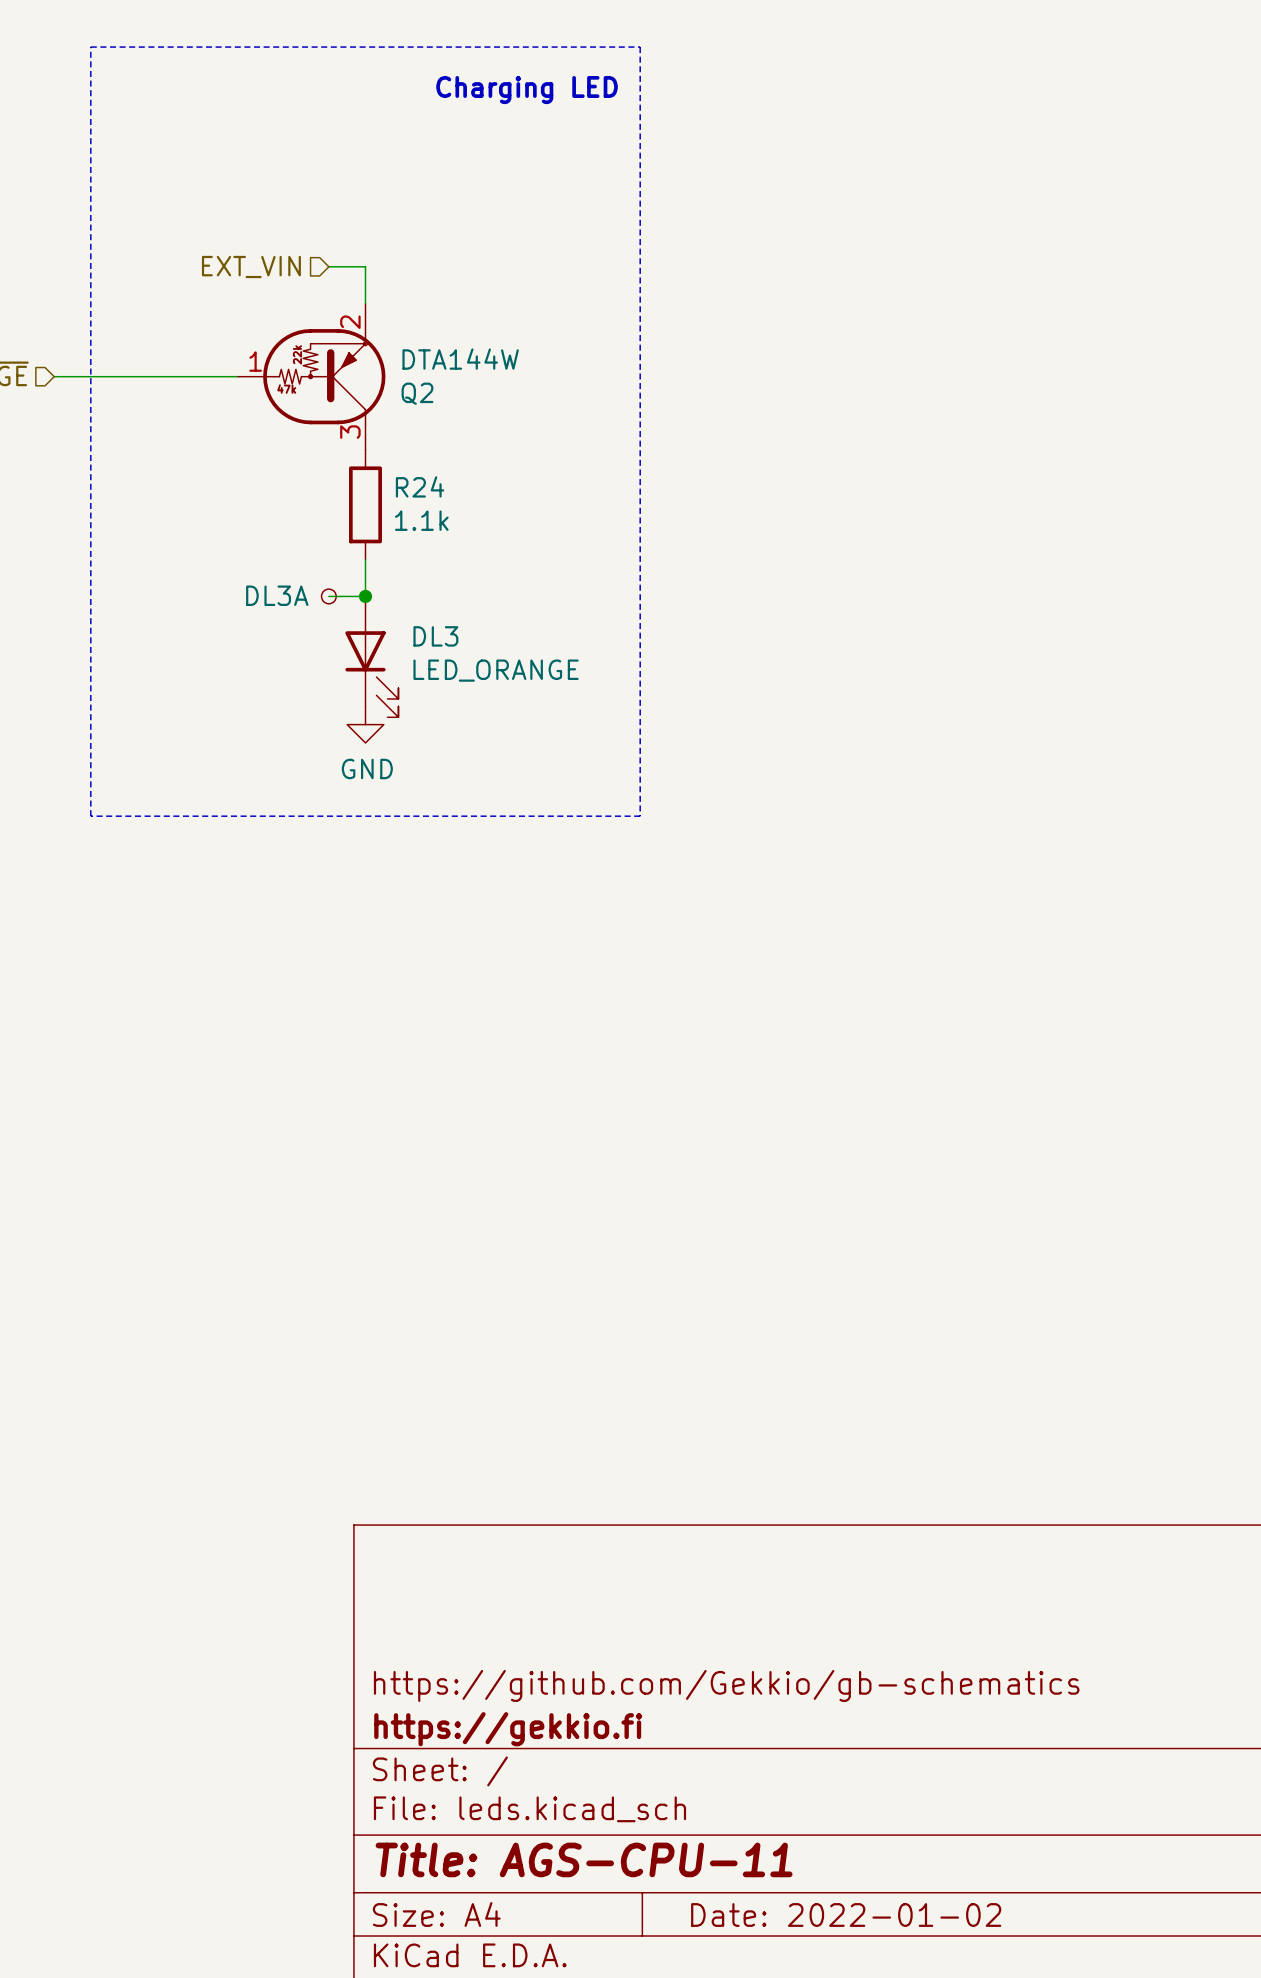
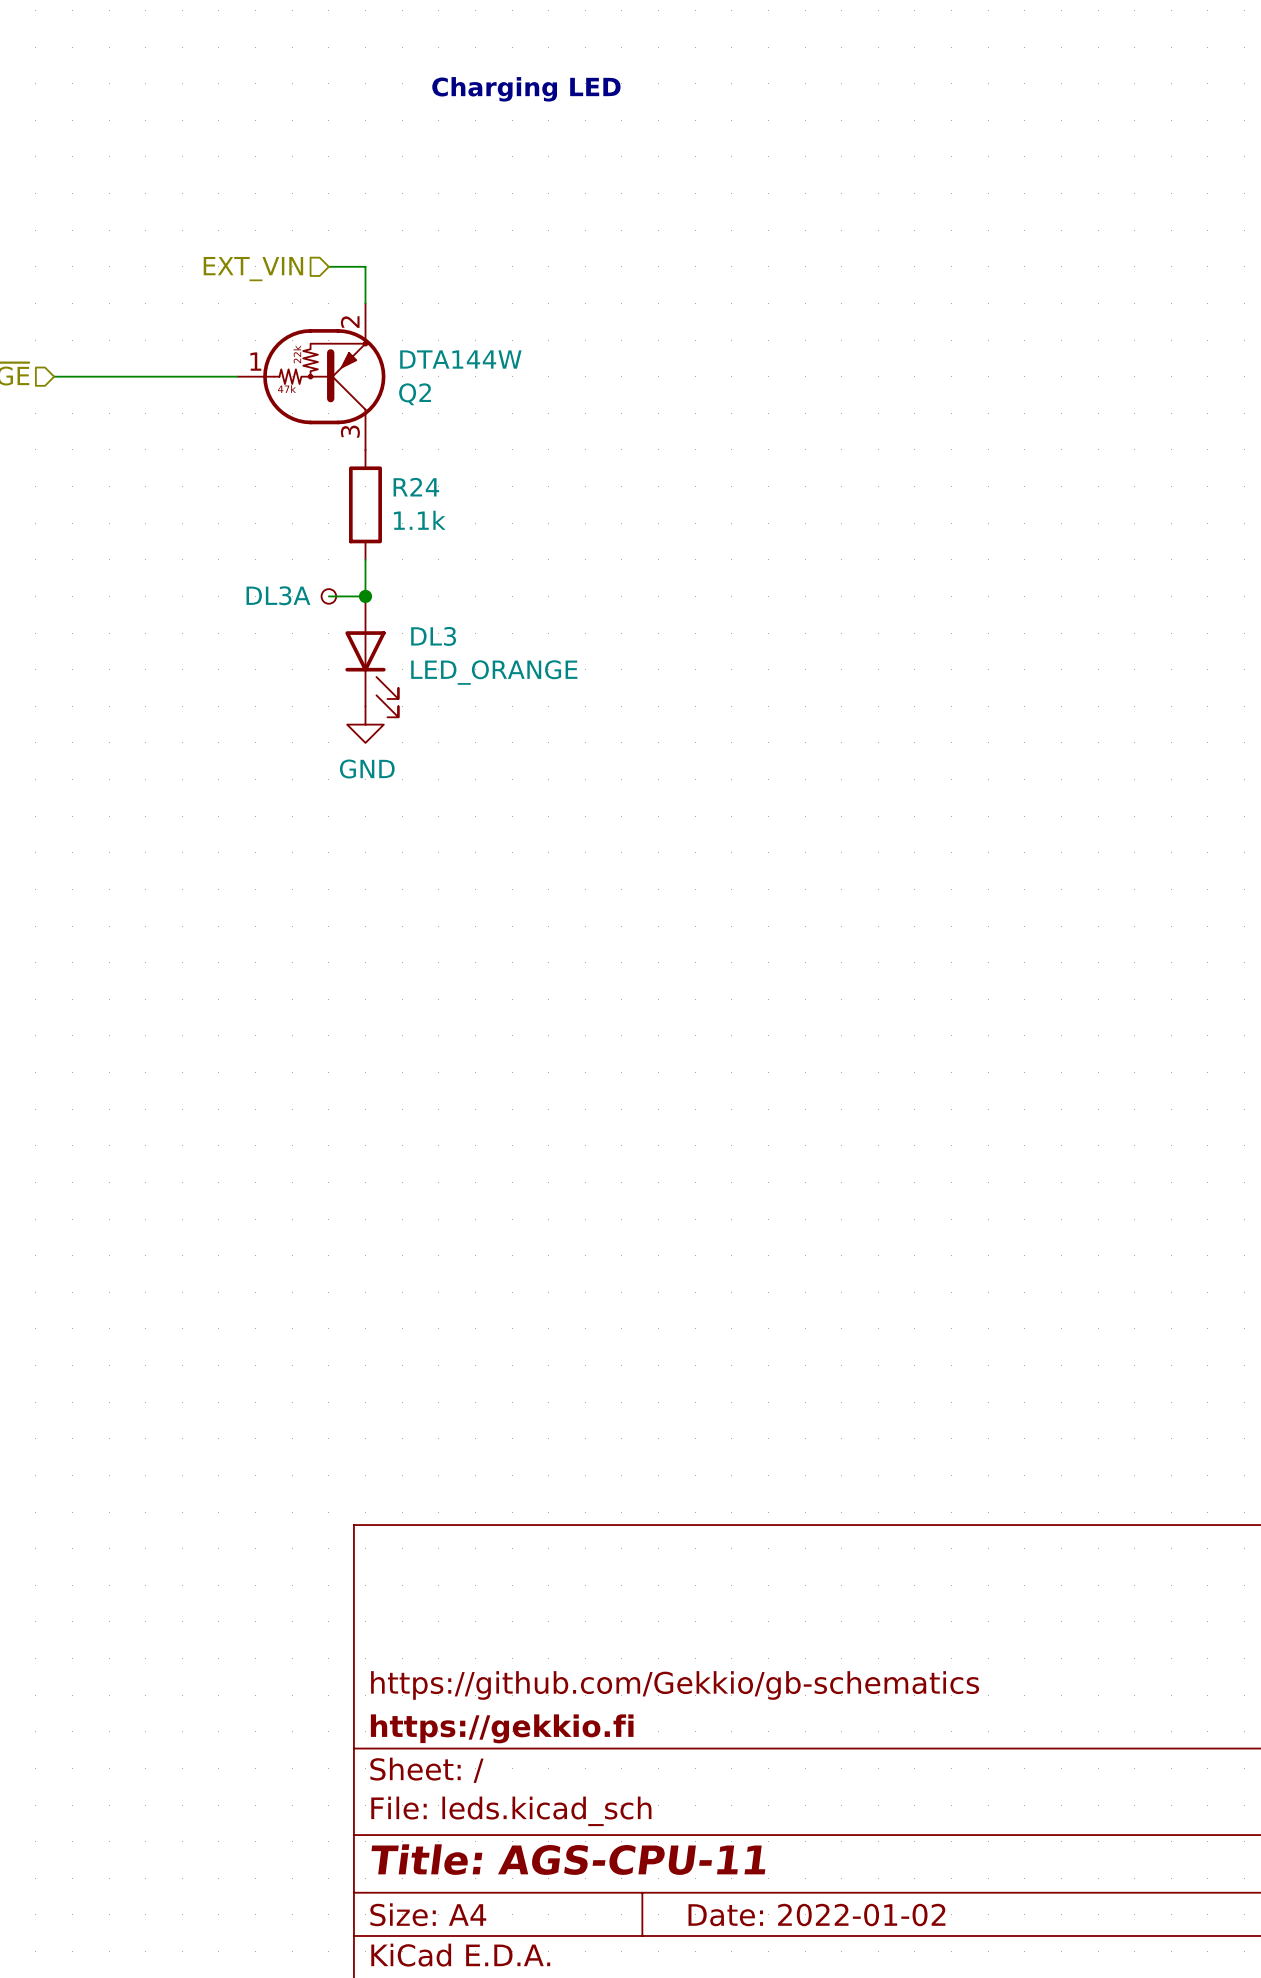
line: (90, 47) (640, 47) (640, 816) (90, 816) (90, 47) -> none

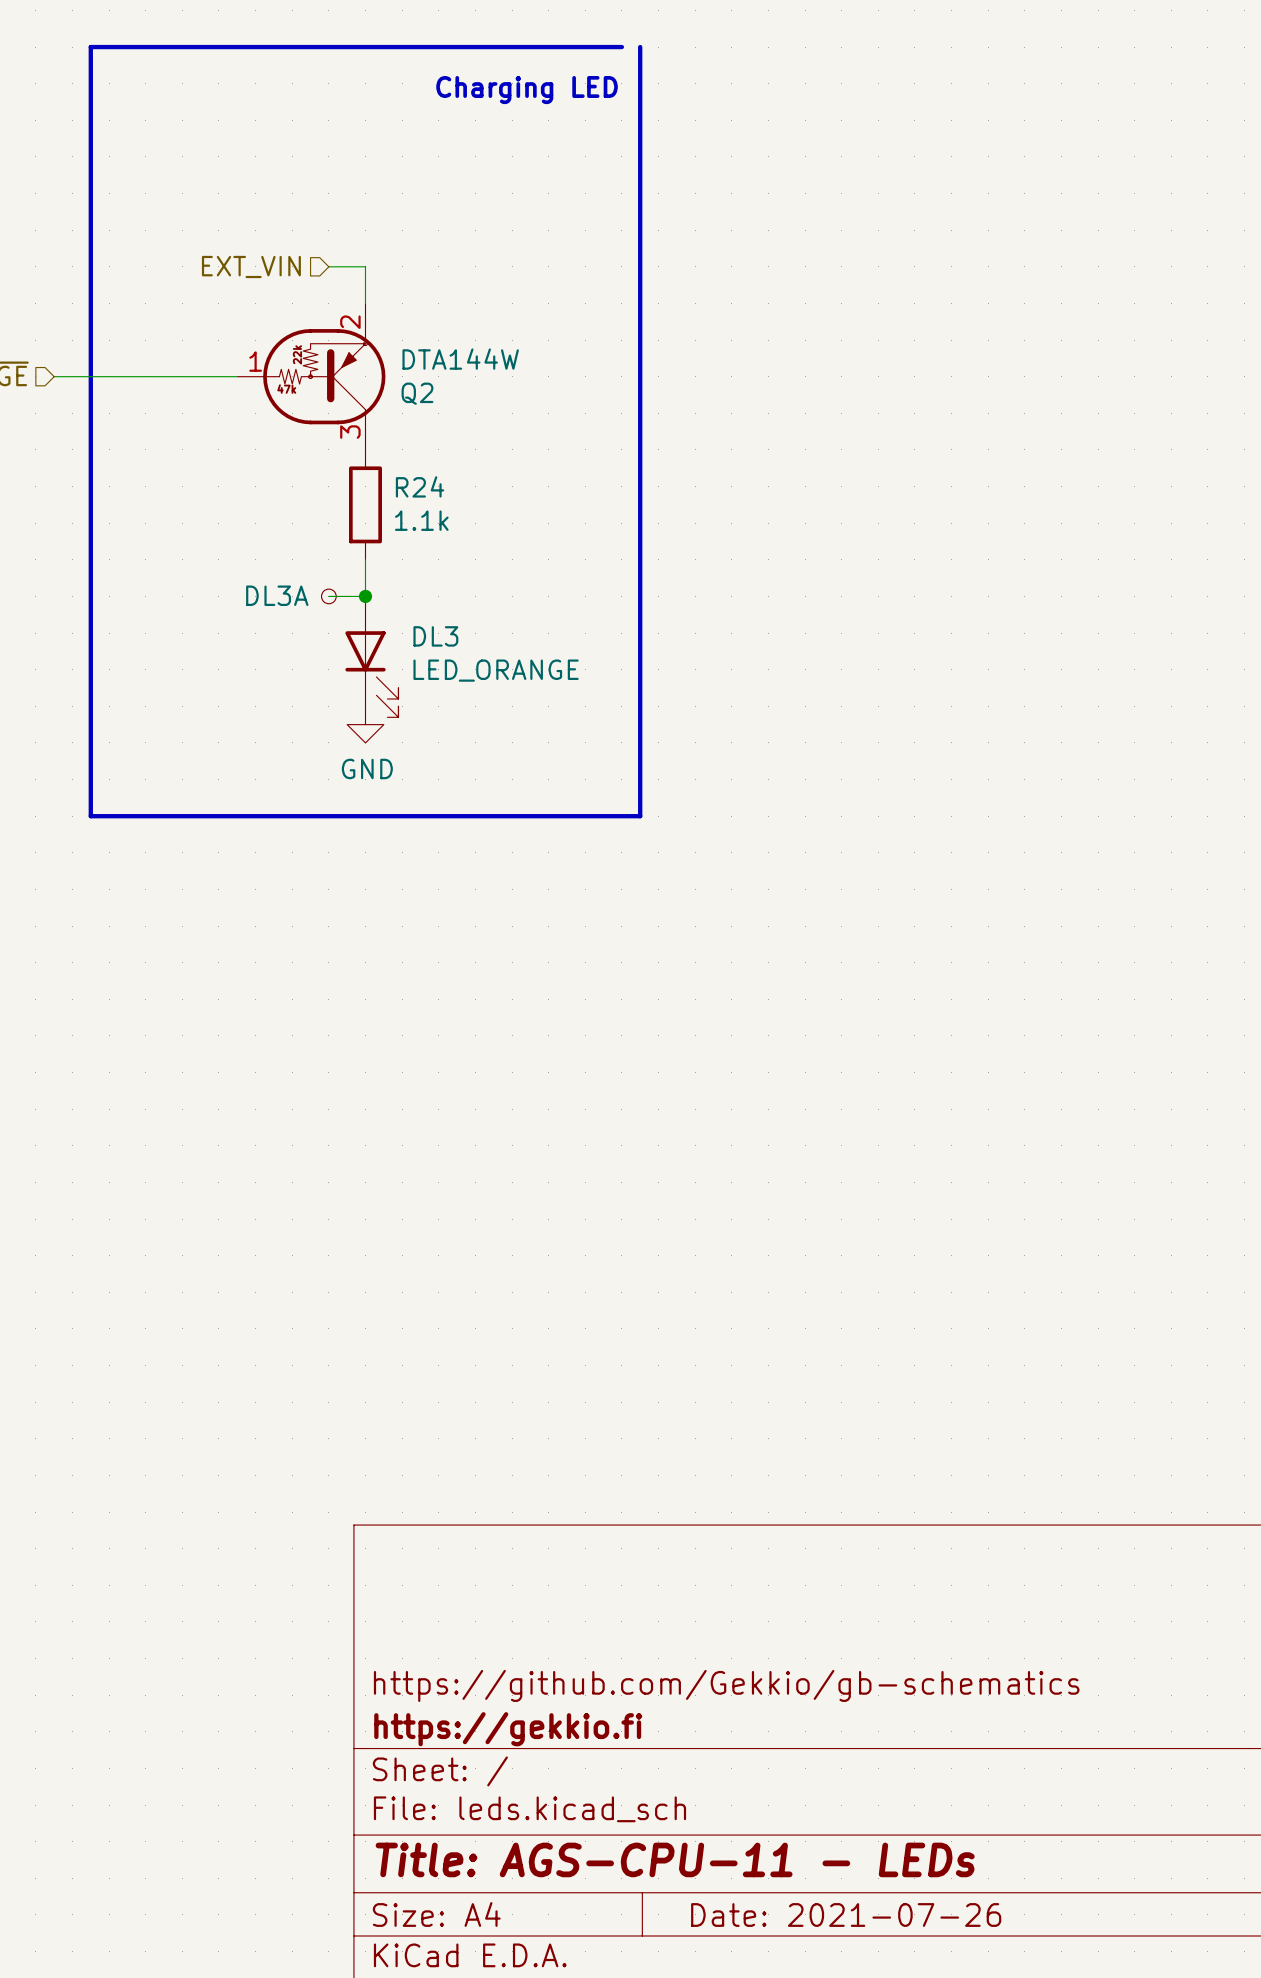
line: none -> (621, 47) (90, 47) (90, 816) (640, 816) (640, 47)
title block: Title: AGS-CPU-11 (568, 1859) -> Title: AGS-CPU-11 - LEDs (675, 1859)
title block: Date: 2022-01-02 (816, 1915) -> Date: 2021-07-26 (846, 1915)

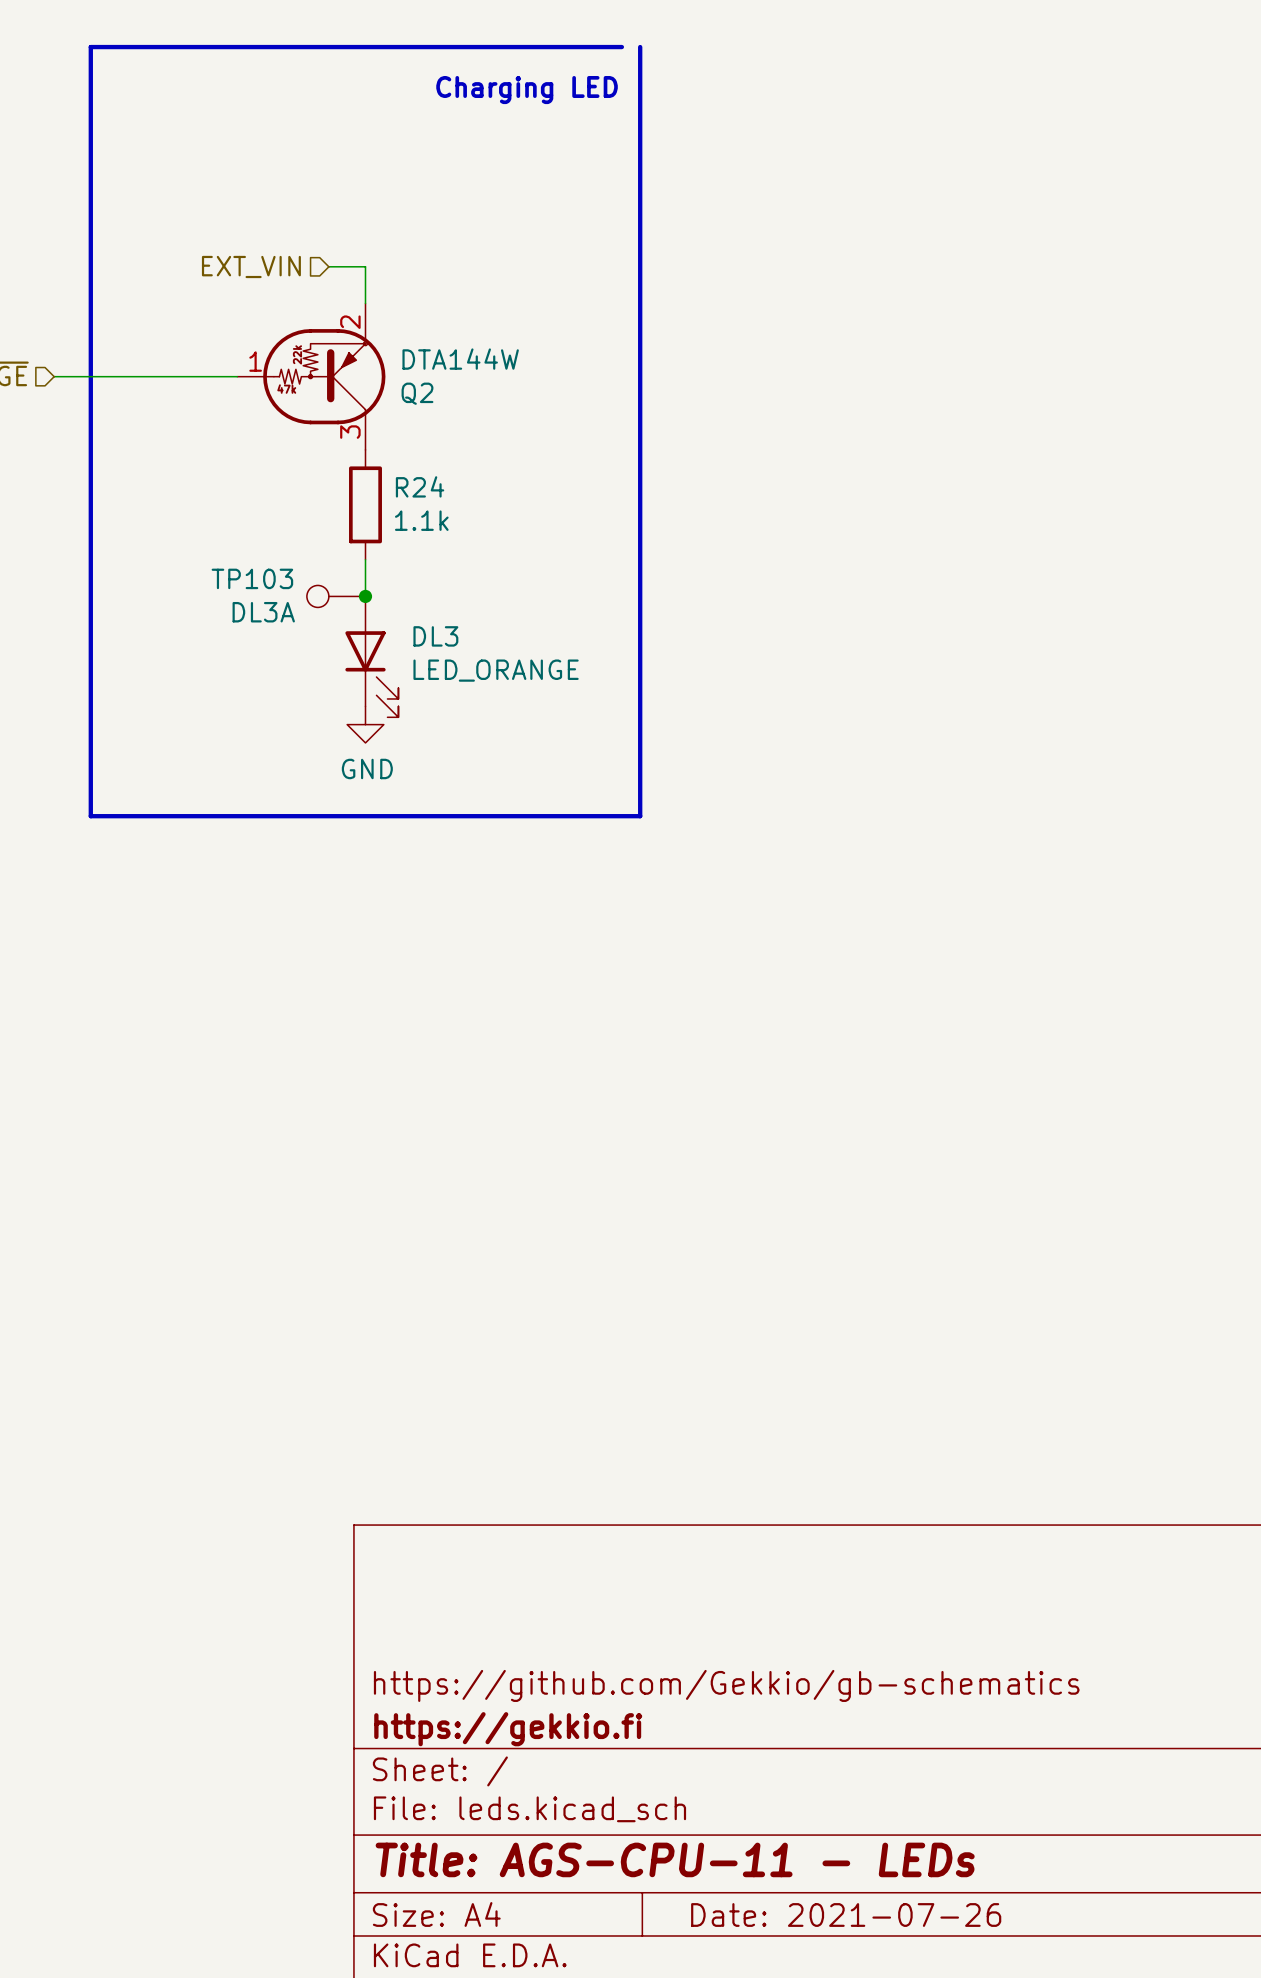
part: DL3A (328, 596) -> none
TP103: none -> DL3A (336, 596)

